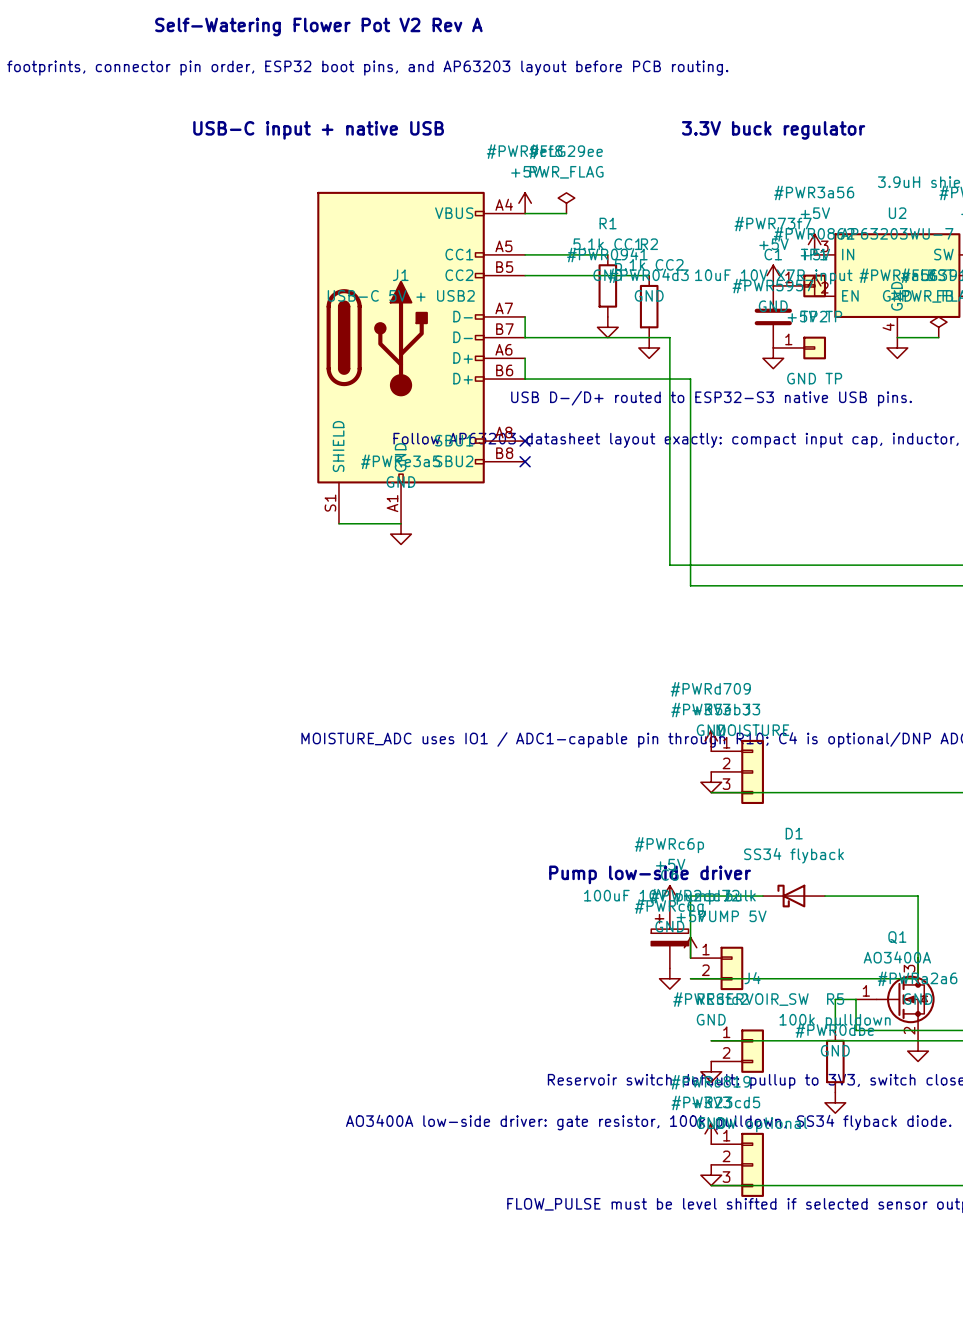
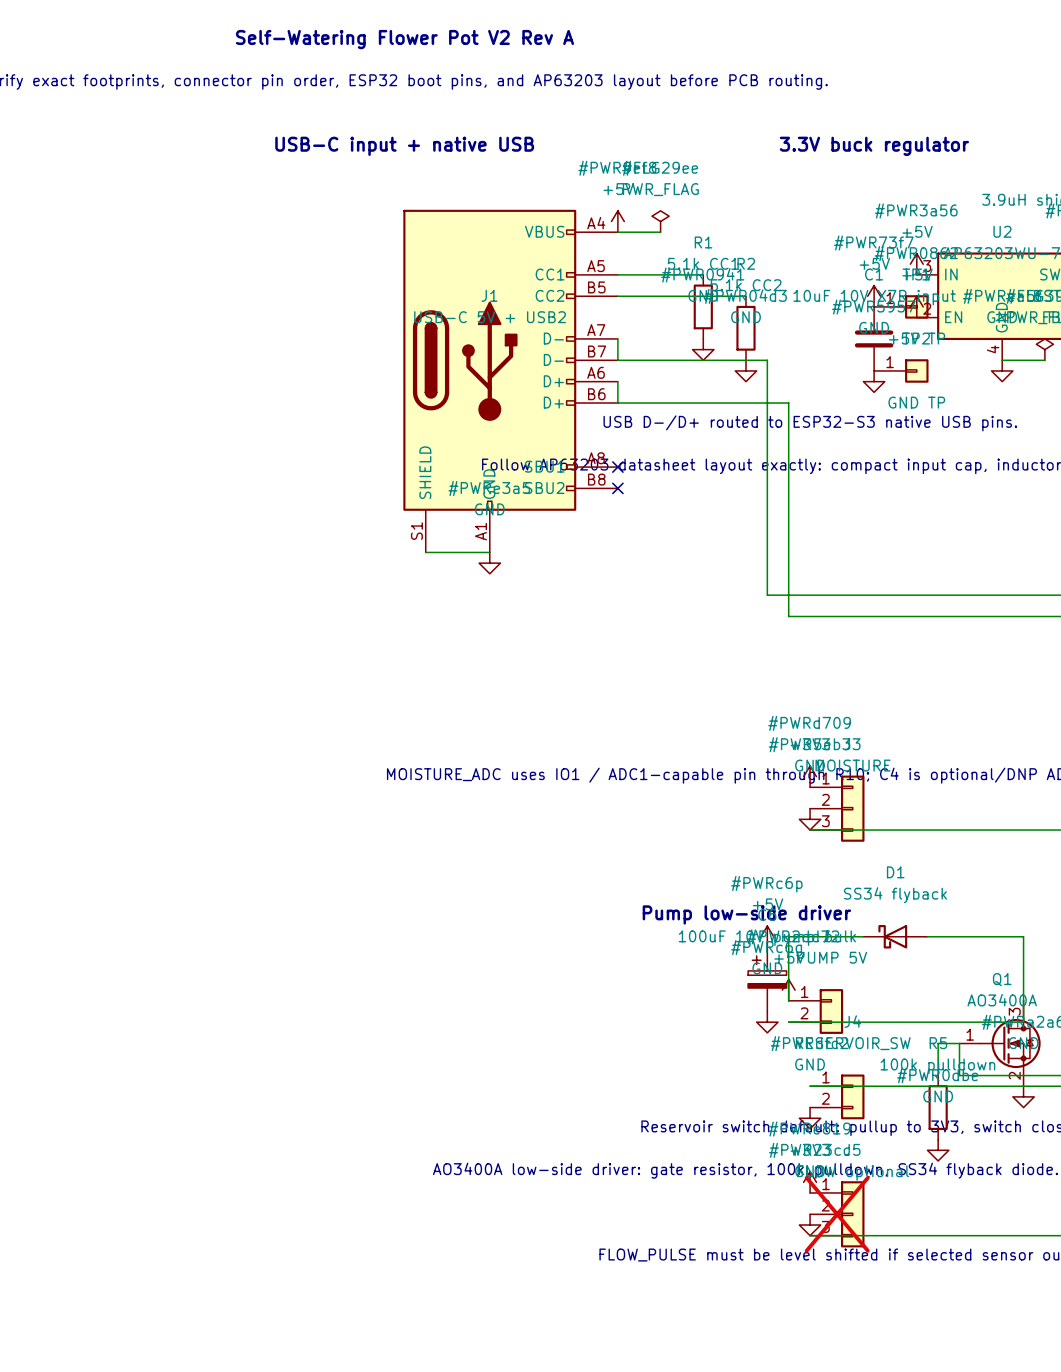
J5 do-not-place cross: none -> (837, 1214)

